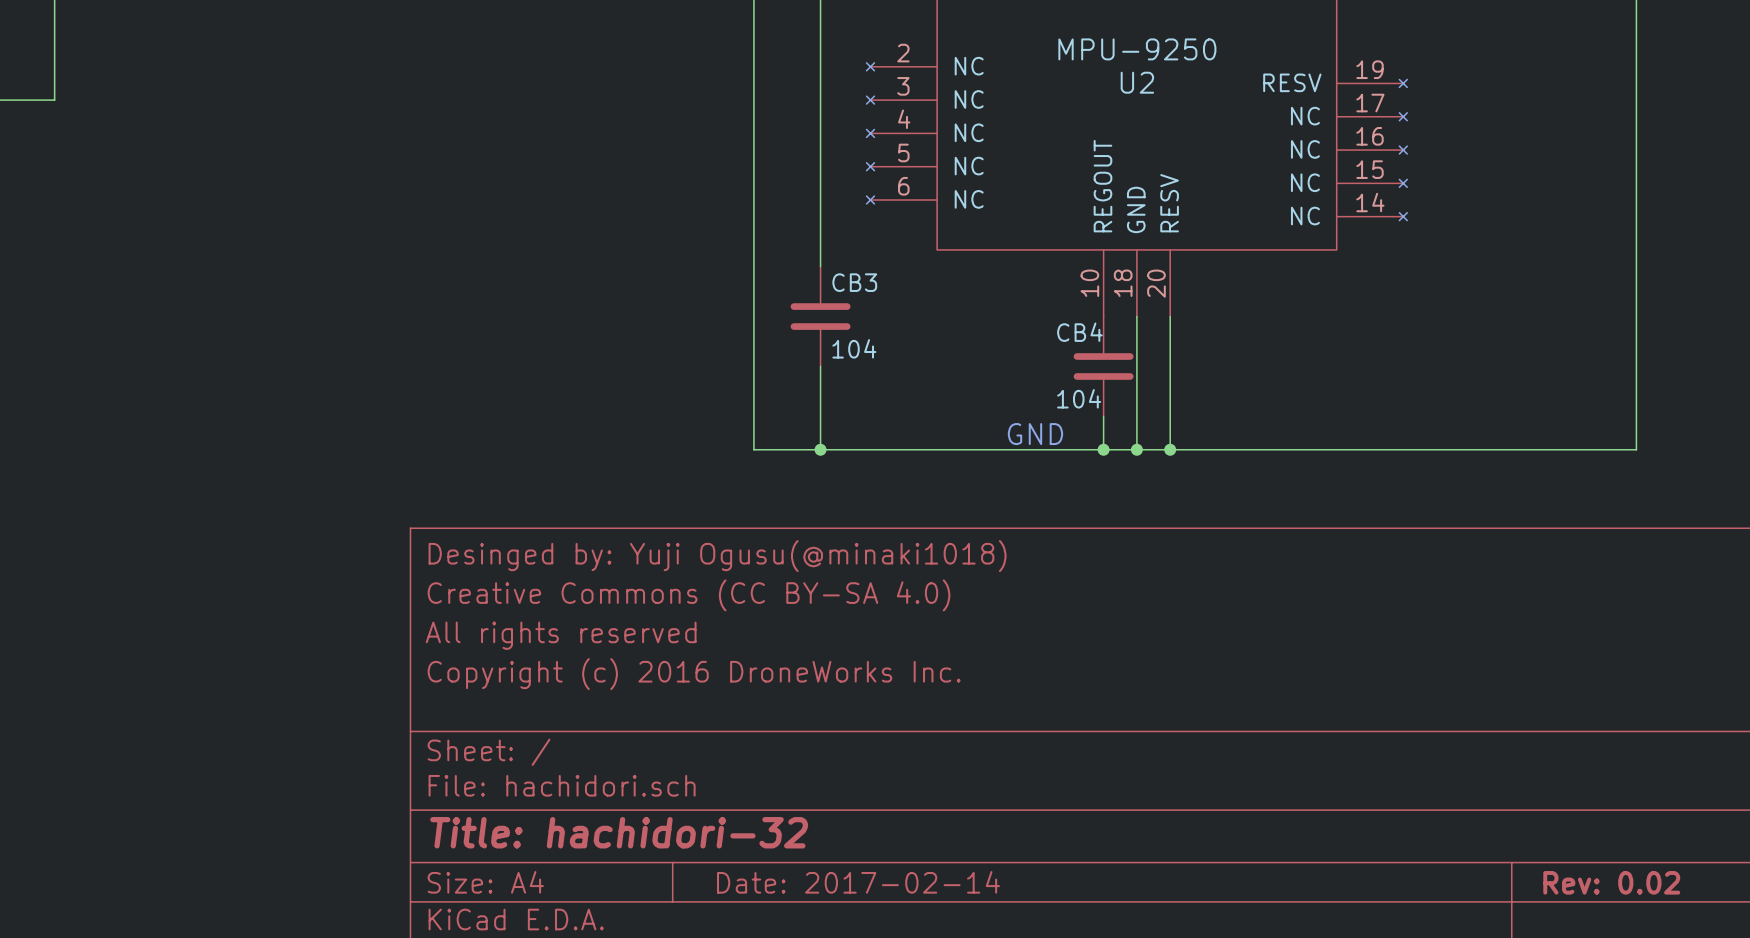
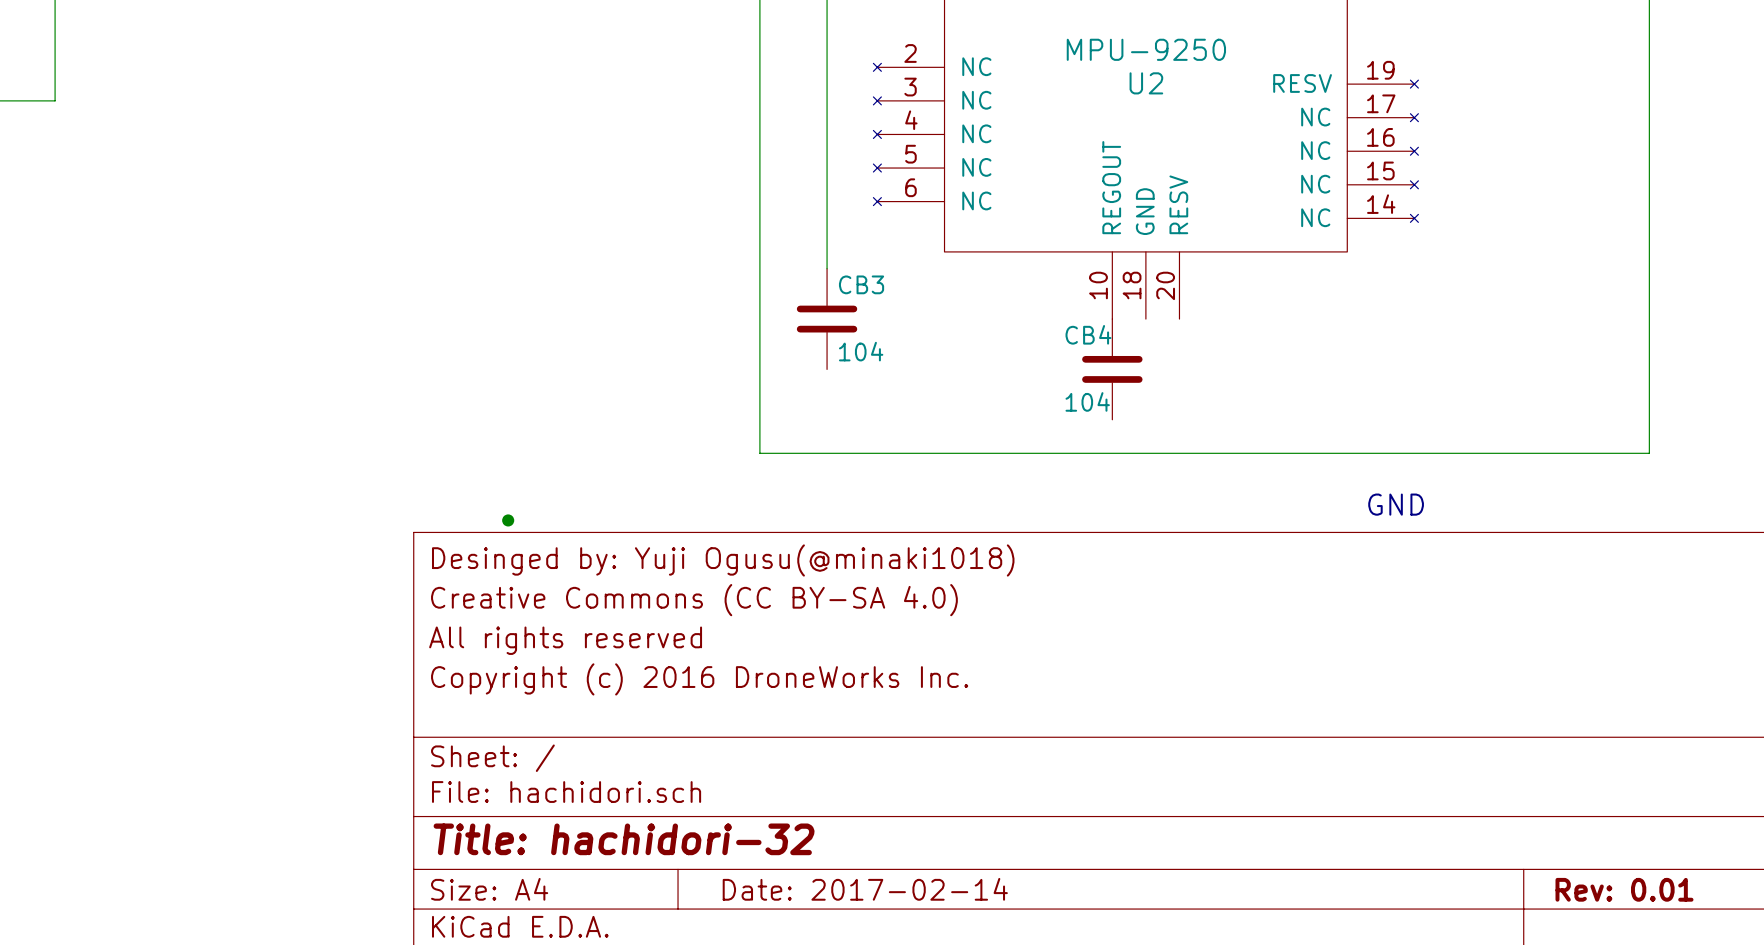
wire: (1136, 316) (1136, 449) -> none
wire: (1170, 316) (1170, 449) -> none
wire: (820, 366) (820, 449) -> none
wire: (1103, 416) (1103, 449) -> none
text: GND (1035, 434) -> none
junction: (820, 449) -> none
junction: (1103, 449) -> none
junction: (1136, 449) -> none
junction: (1170, 449) -> none
text: none -> GND (1396, 504)
junction: none -> (508, 520)
title block: Rev: 0.02 (1611, 882) -> Rev: 0.01 (1624, 889)

